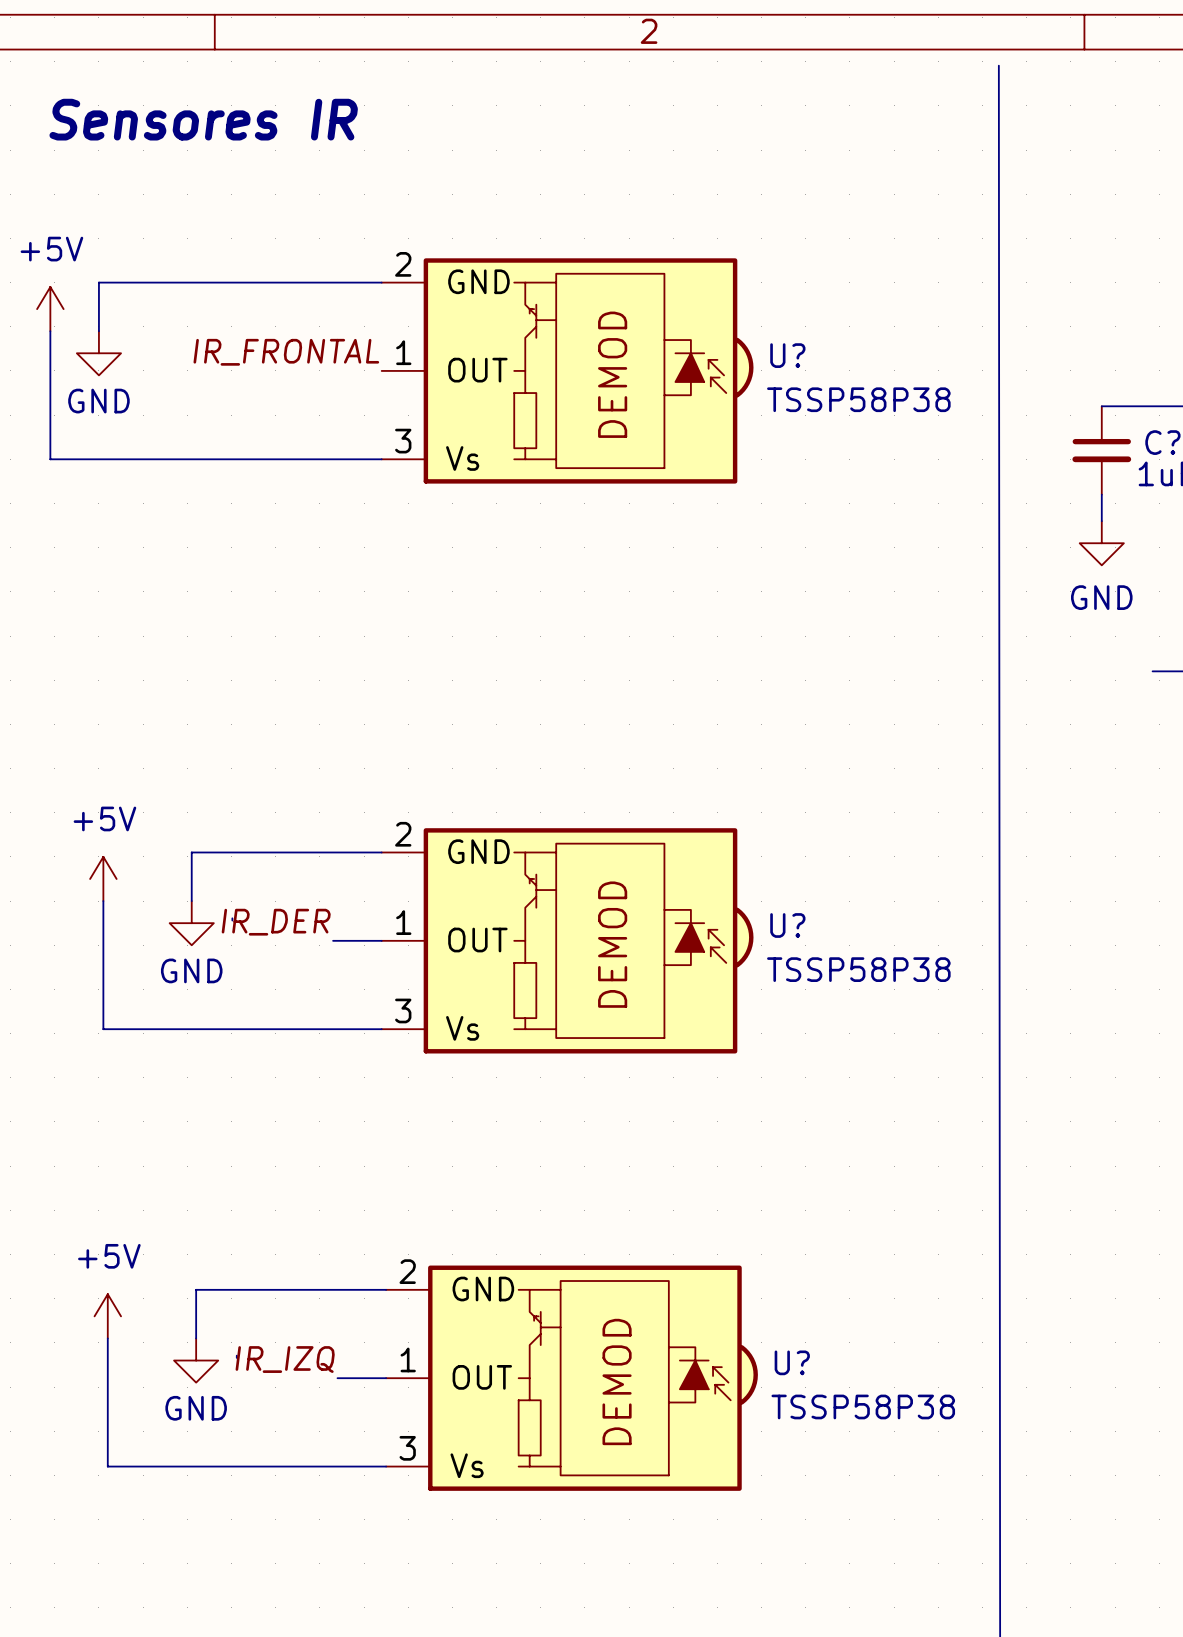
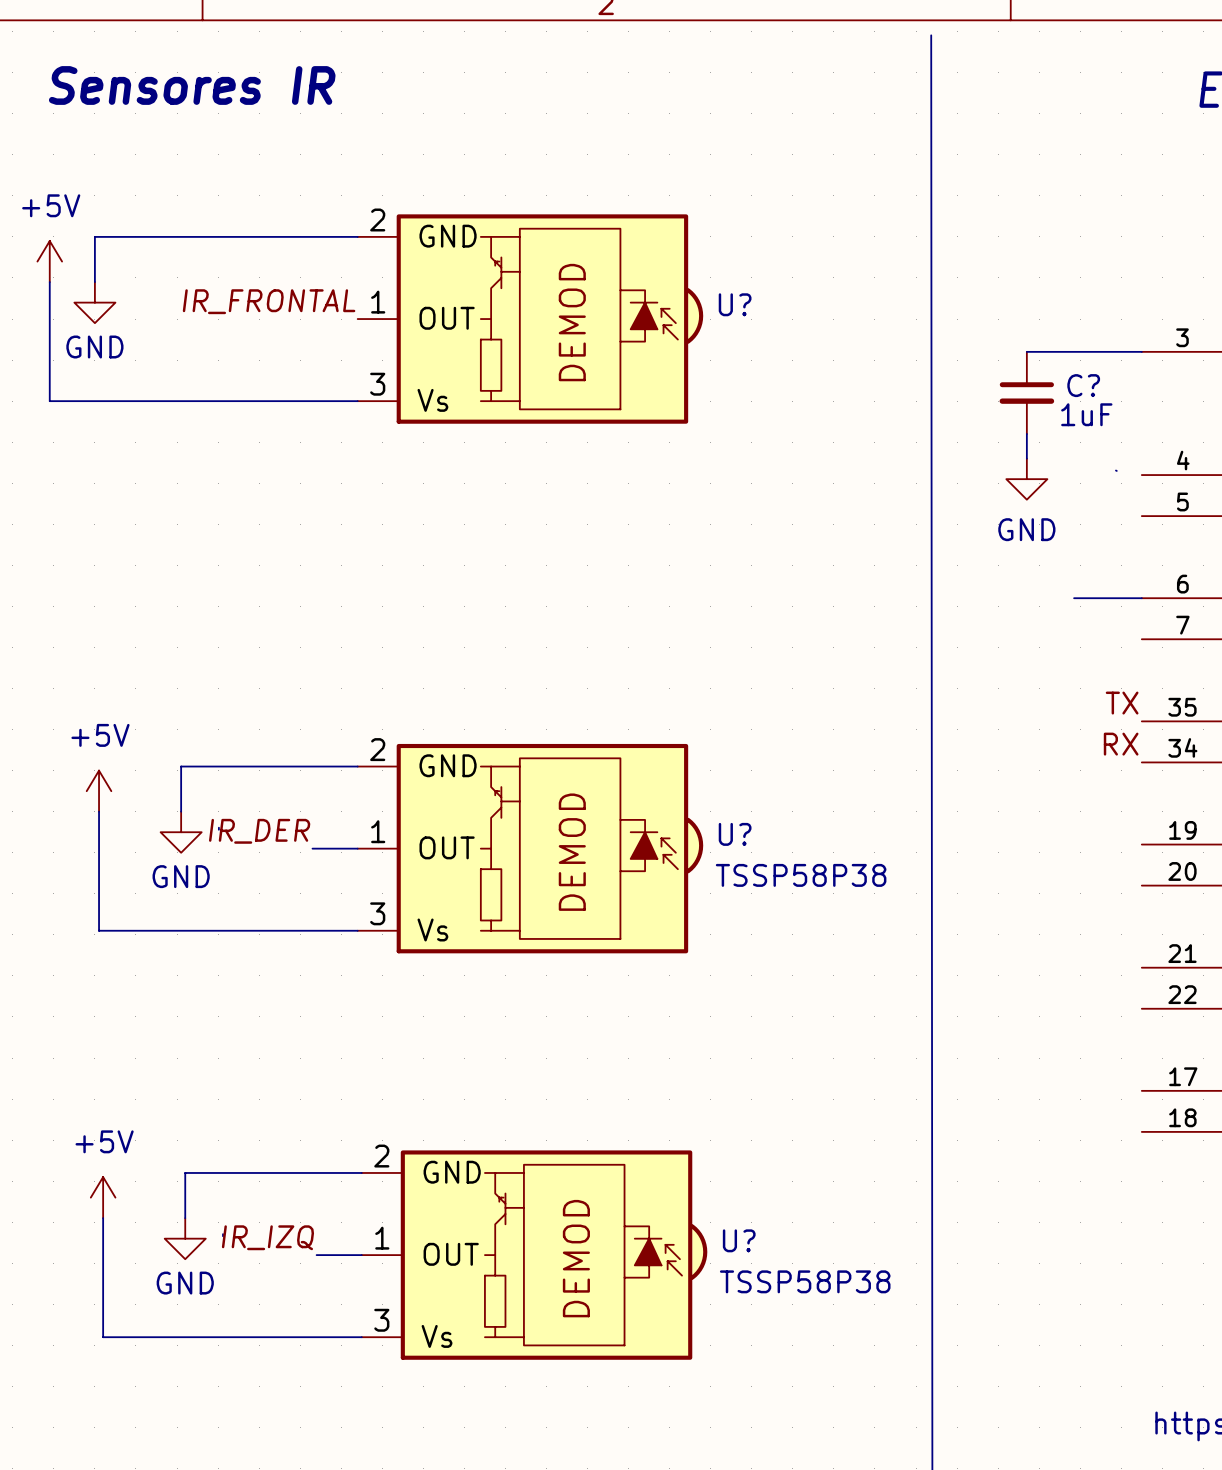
U? value: TSSP58P38 (858, 399) -> none

